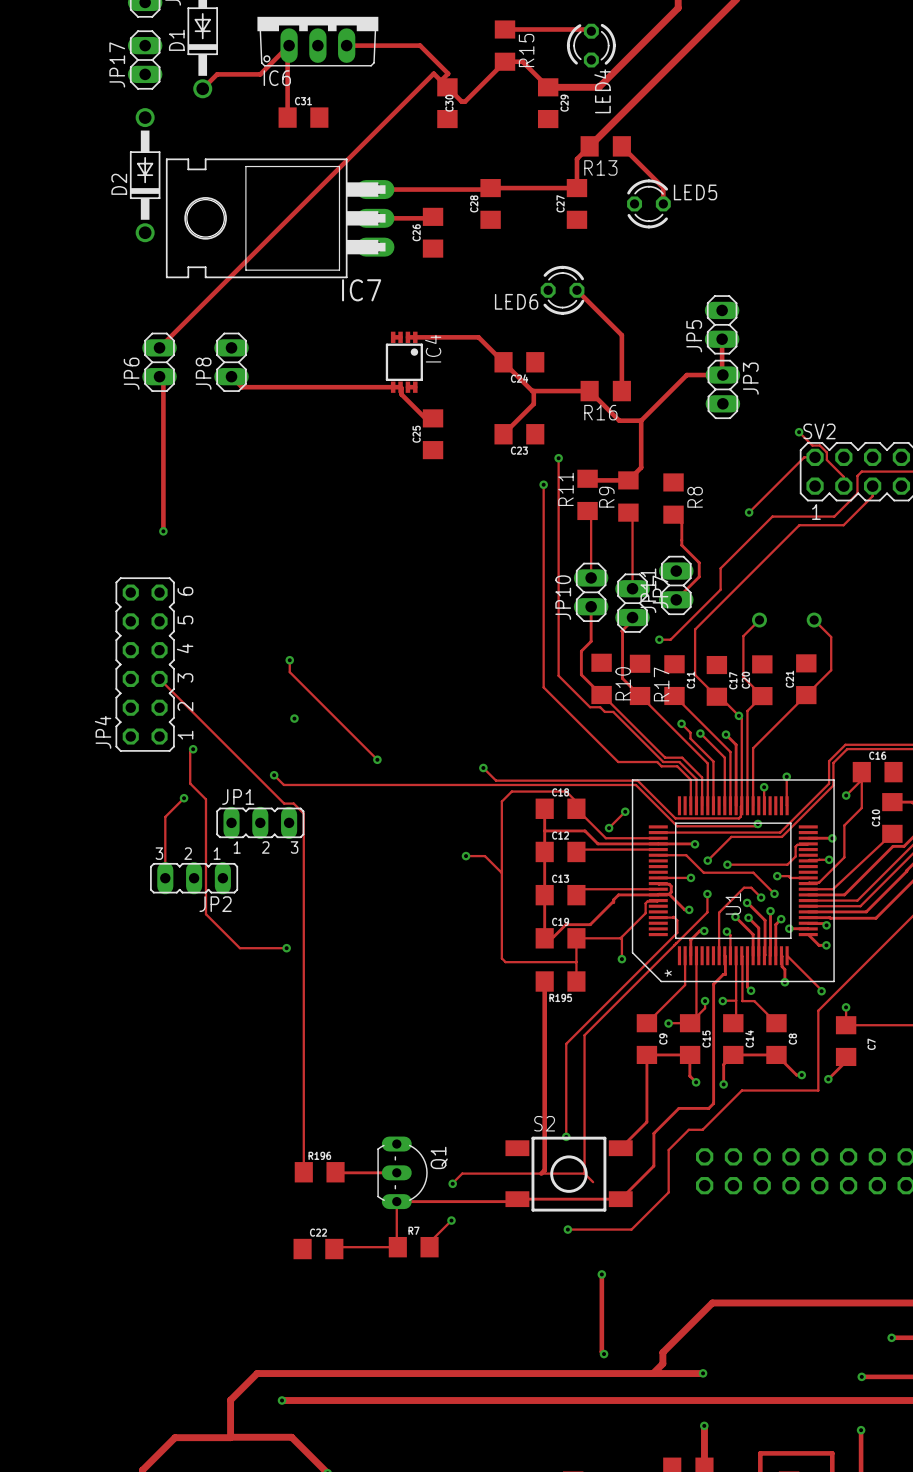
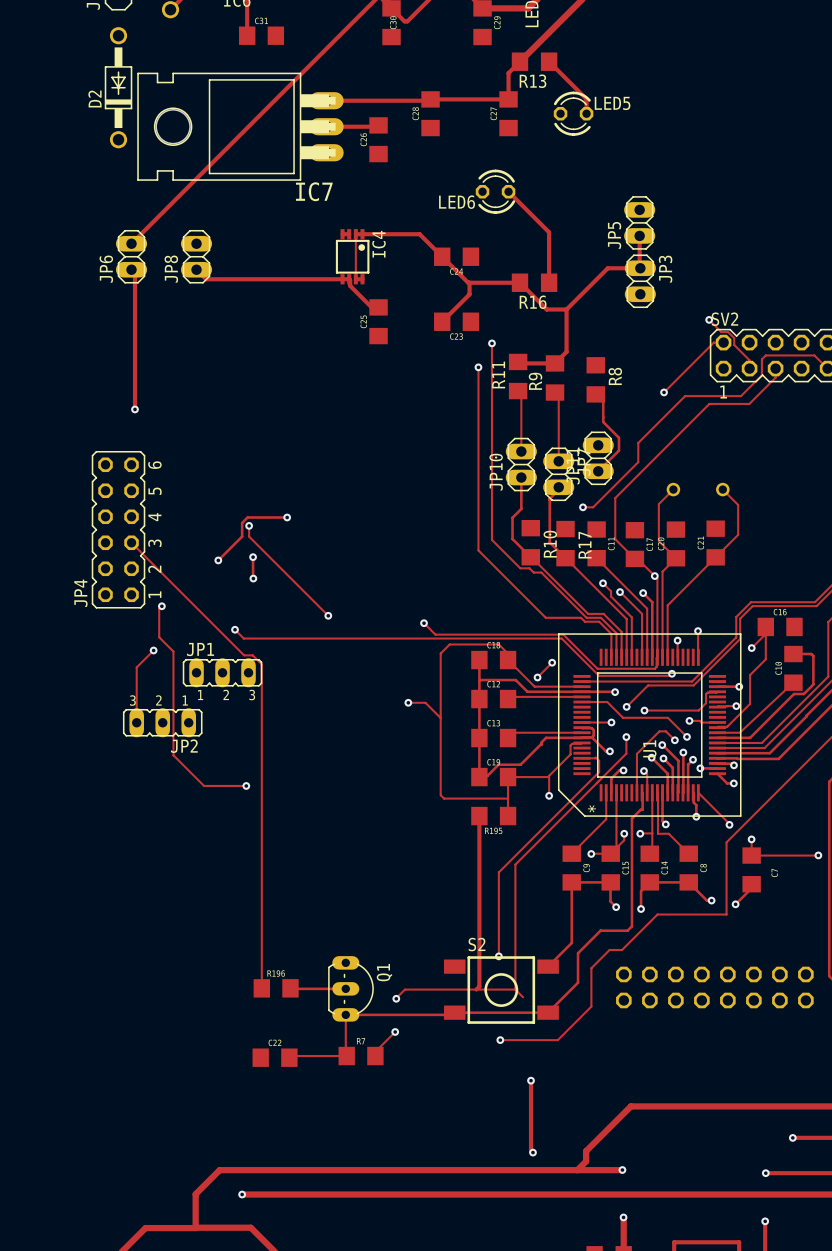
track: none -> (355, 234) (357, 279)
track: none -> (287, 517) (247, 517) (242, 522) (242, 536) (218, 560)
via: none -> (287, 517)
track: none -> (253, 557) (253, 578)
via: none -> (253, 557)
via: none -> (218, 560)

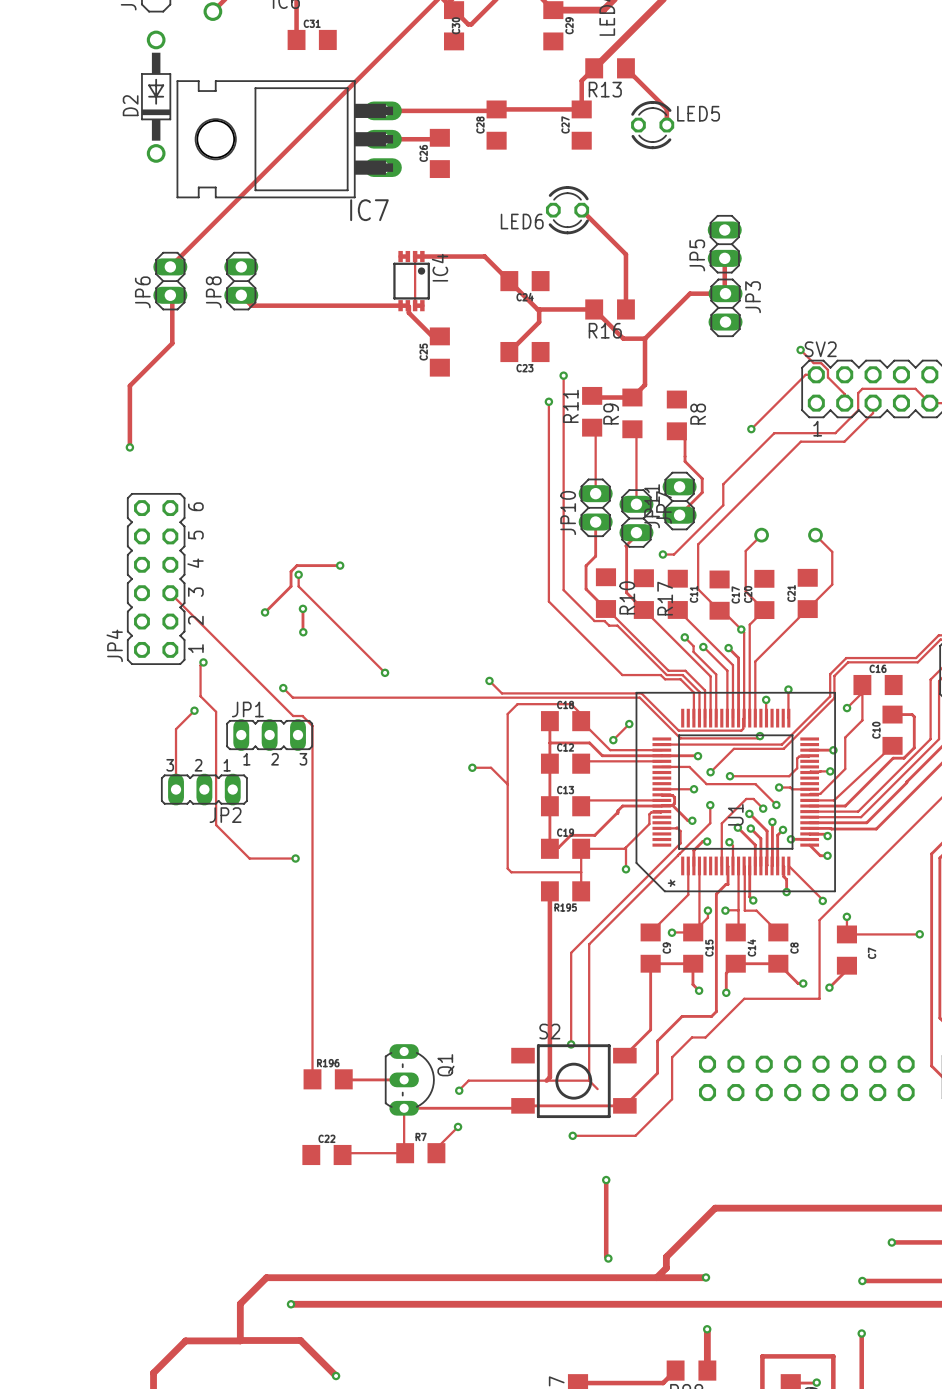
track: (133, 271) (135, 273) (135, 409) -> (172, 297) (172, 343) (129, 385) (129, 447)
via position: (135, 409) -> (129, 447)

